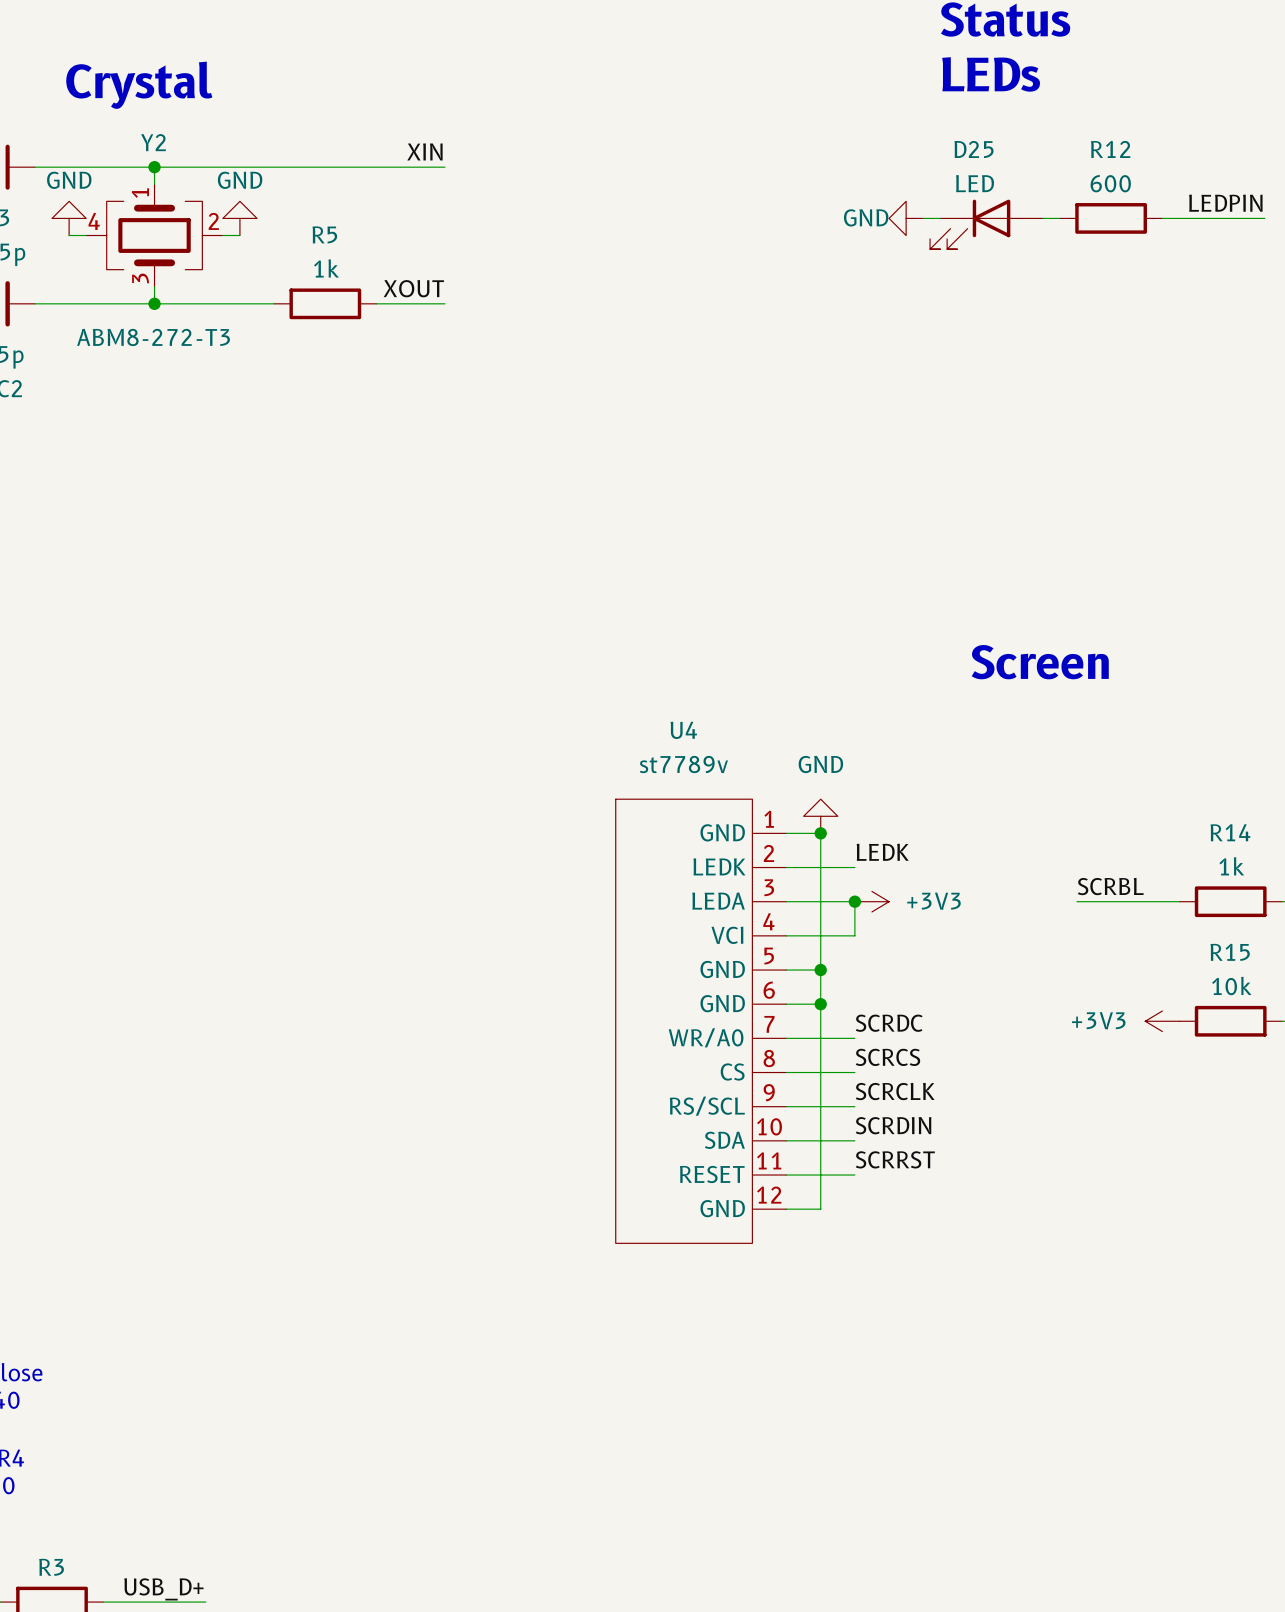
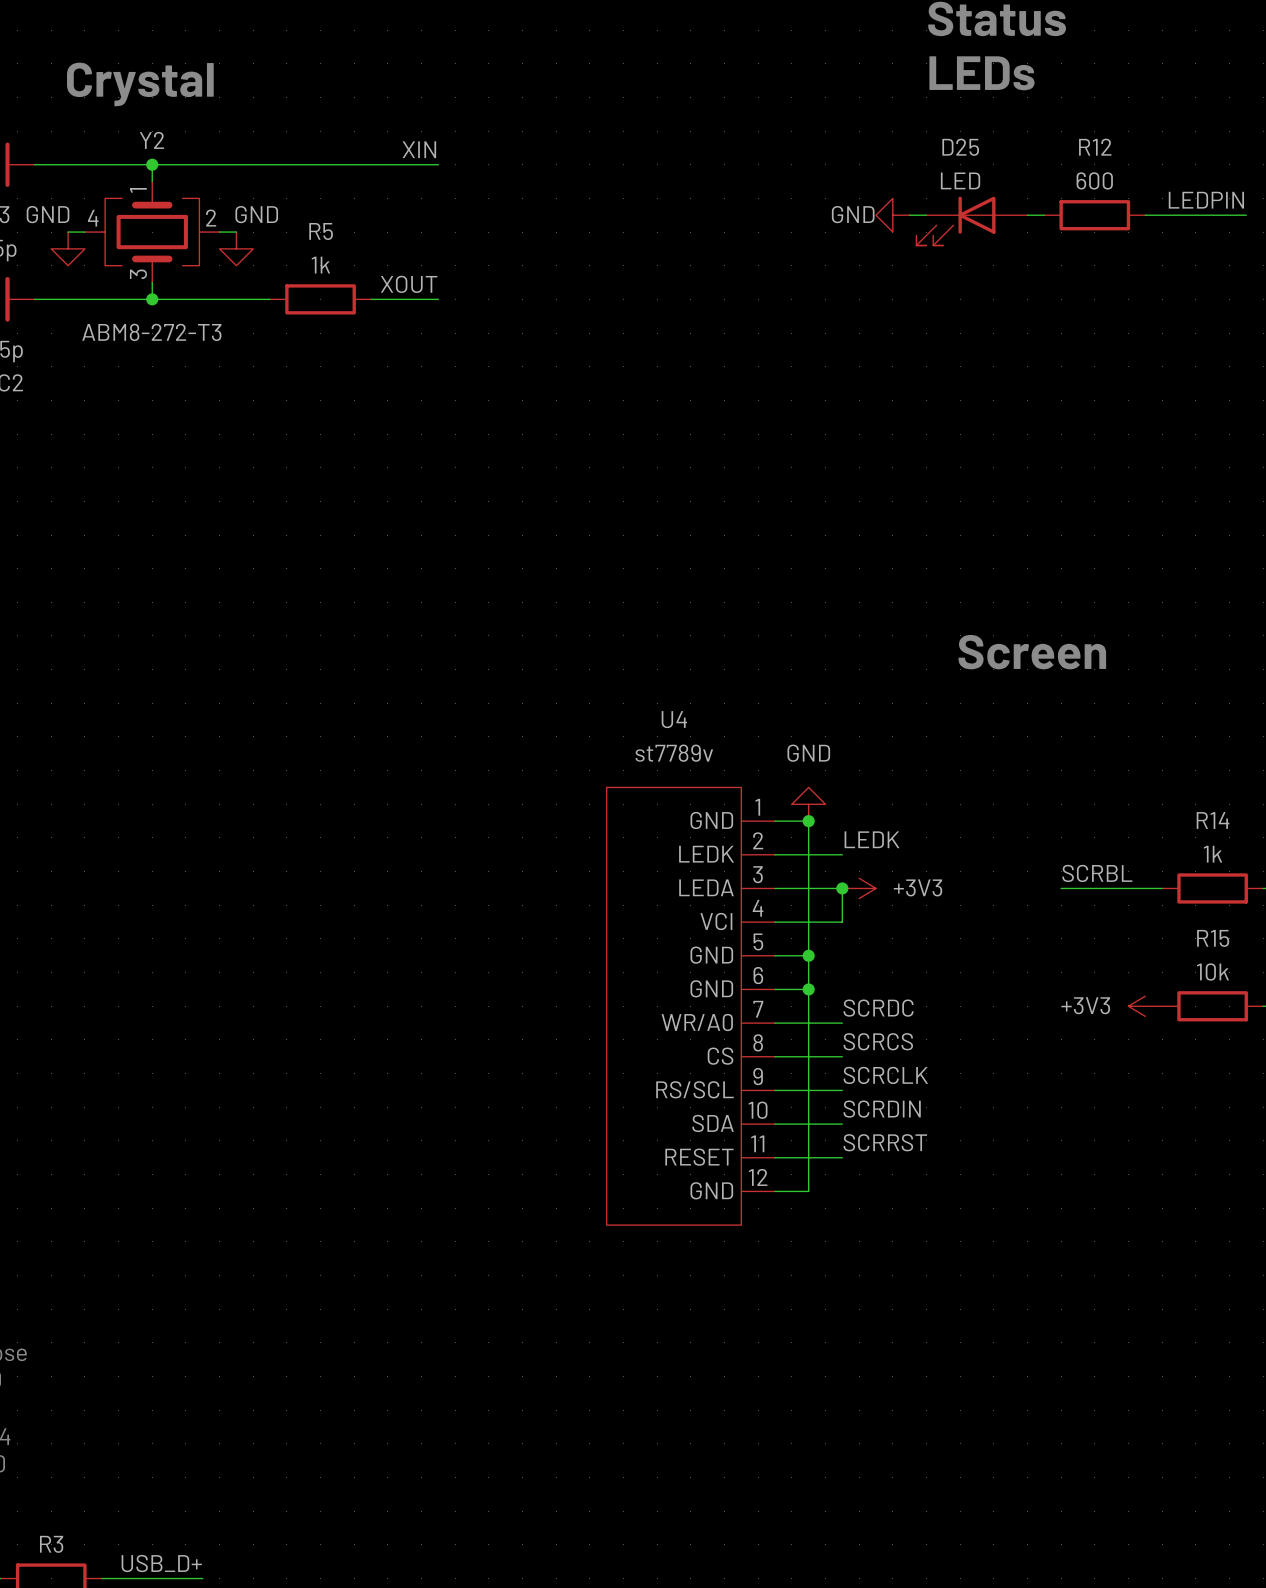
power symbol rotation: 0° (69, 218) -> 180° (68, 248)
power symbol position: GND (69, 218) -> GND (68, 248)
power symbol rotation: 0° (239, 218) -> 180° (236, 248)
power symbol position: GND (239, 218) -> GND (236, 248)

